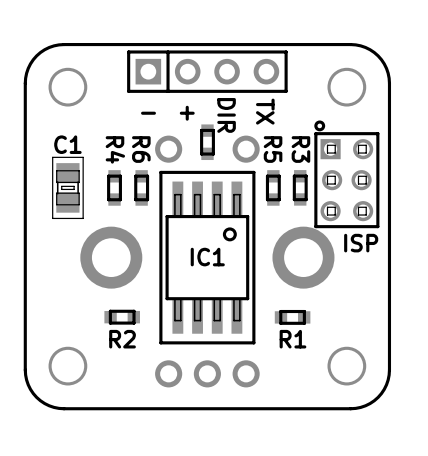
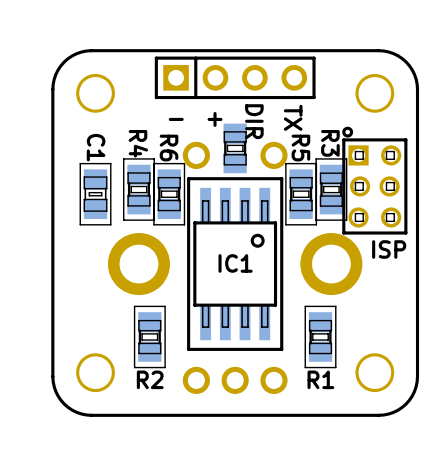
part footprint: [200, 124, 215, 161] -> [223, 123, 247, 174]
C1 name rotation: 0° (67, 144) -> 90° clockwise (96, 147)
R4 footprint: [107, 170, 122, 206] -> [123, 158, 155, 221]
R6 footprint: [134, 170, 150, 206] -> [153, 163, 185, 226]
R5 footprint: [265, 170, 281, 206] -> [285, 163, 317, 226]
R3 footprint: [292, 170, 308, 206] -> [315, 158, 348, 221]
R2 footprint: [104, 309, 140, 325] -> [134, 305, 166, 368]
R1 footprint: [274, 309, 311, 325] -> [304, 305, 337, 368]

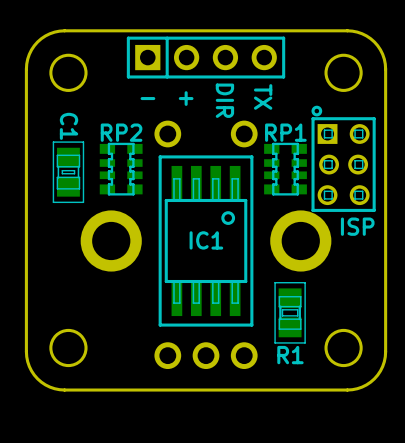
part: (235, 148) -> none
R4: (138, 189) -> none
R3: (331, 189) -> none
RP2: none -> (121, 169)
RP1: none -> (285, 169)
R6: (169, 194) -> none
R5: (301, 194) -> none
R2: (149, 336) -> none

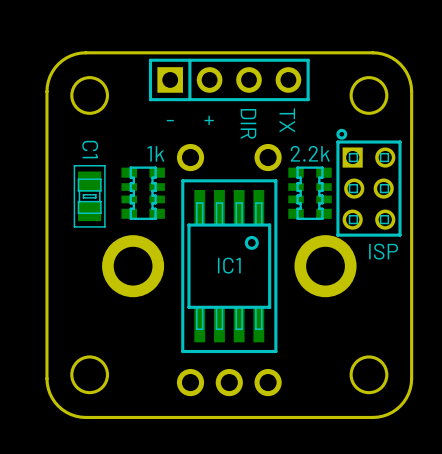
RP2 value: none -> 1k (155, 153)
RP1 value: none -> 2.2k (310, 153)
RP2 name: RP2 (121, 132) -> none
RP1 name: RP1 (285, 132) -> none
R1: (290, 312) -> none

